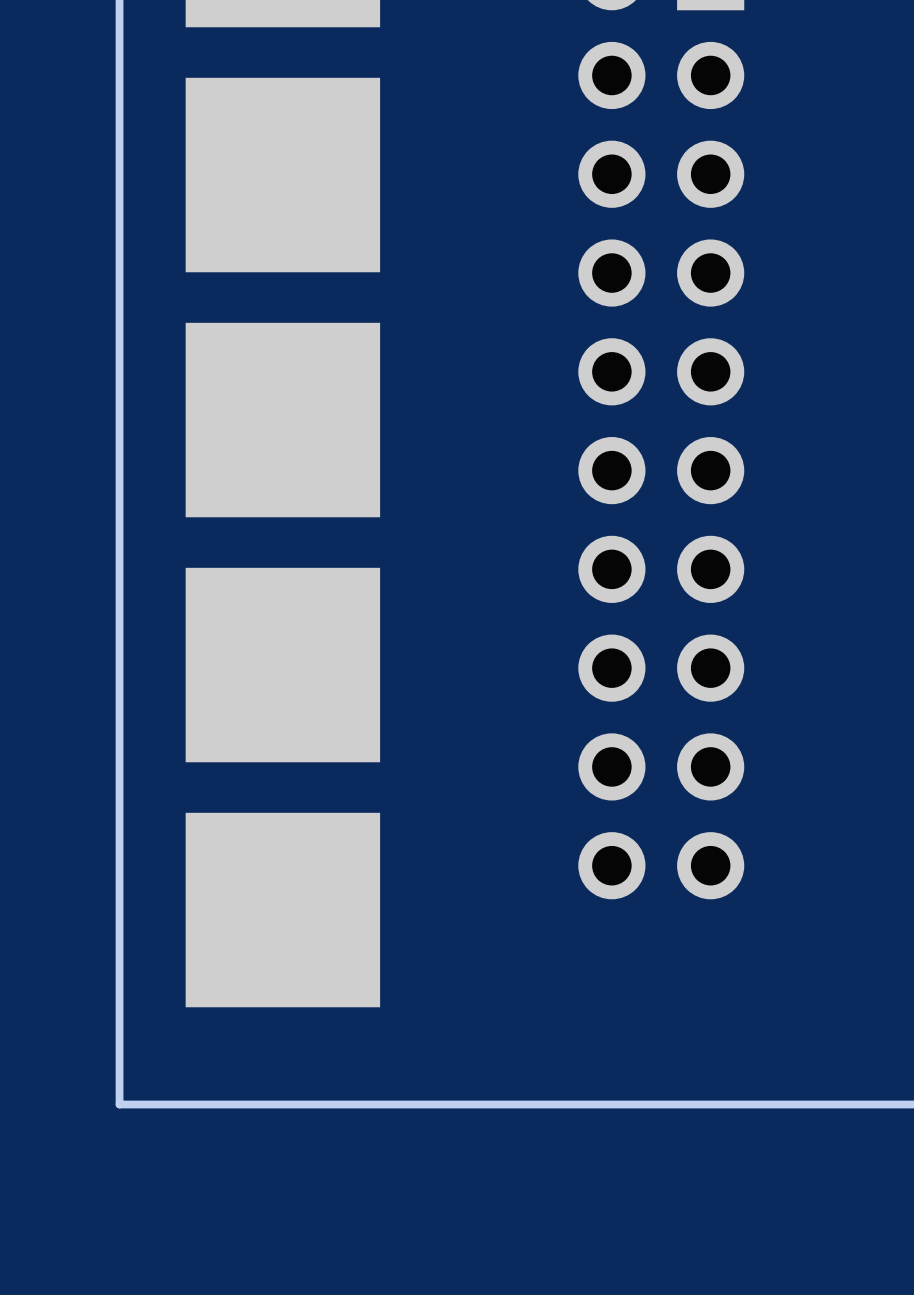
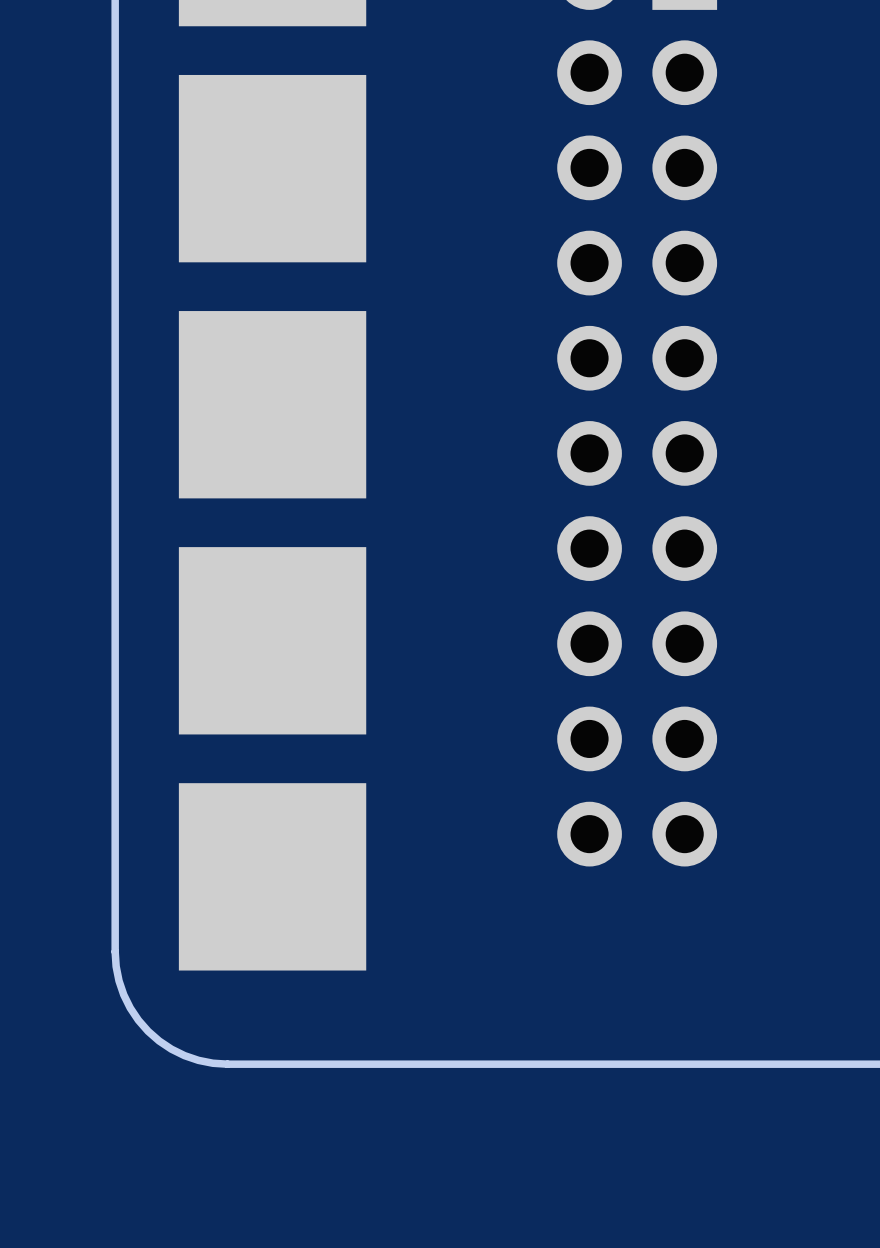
board edge: (119, 987) (119, 1104) (236, 1104) -> (115, 951) (119, 980) (123, 994) (138, 1020) (148, 1031) (159, 1040) (184, 1055) (212, 1063) (227, 1064)

